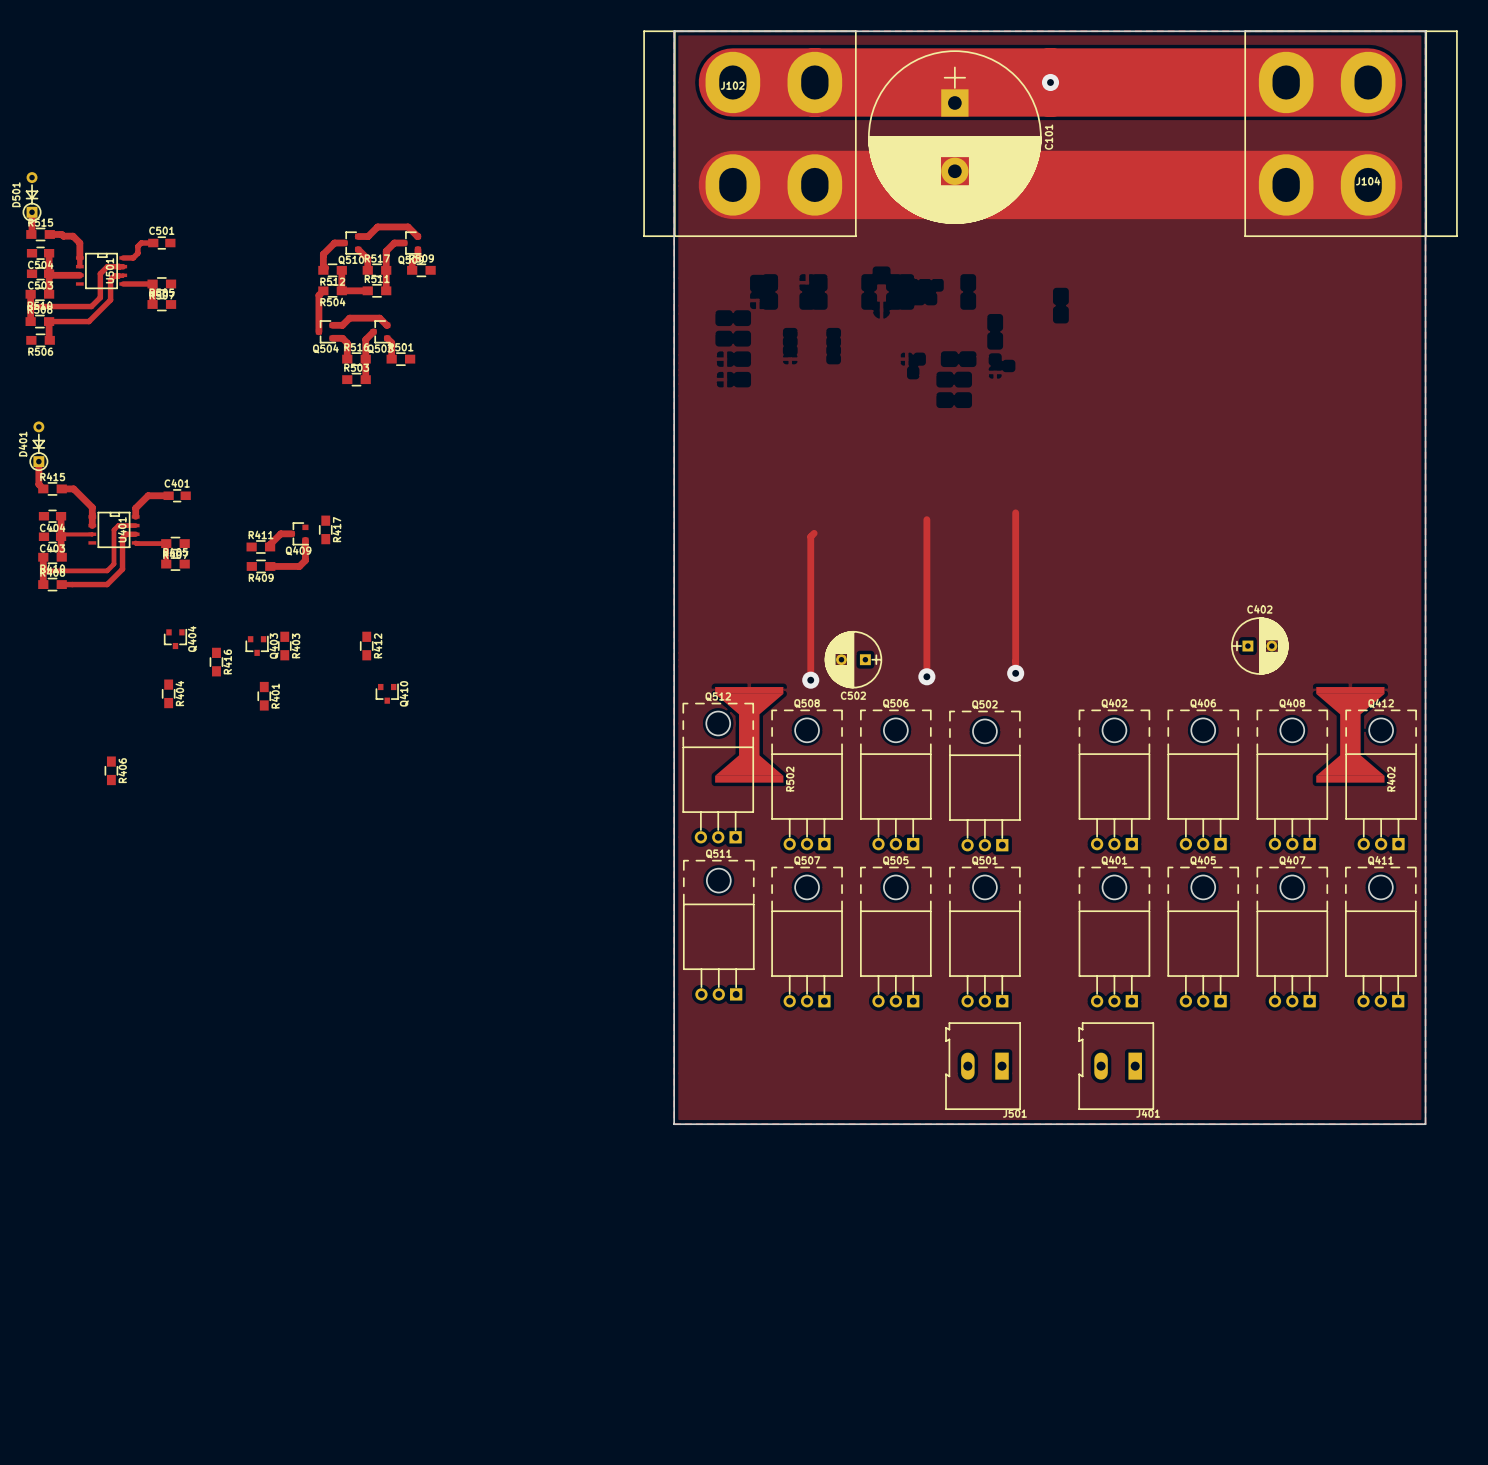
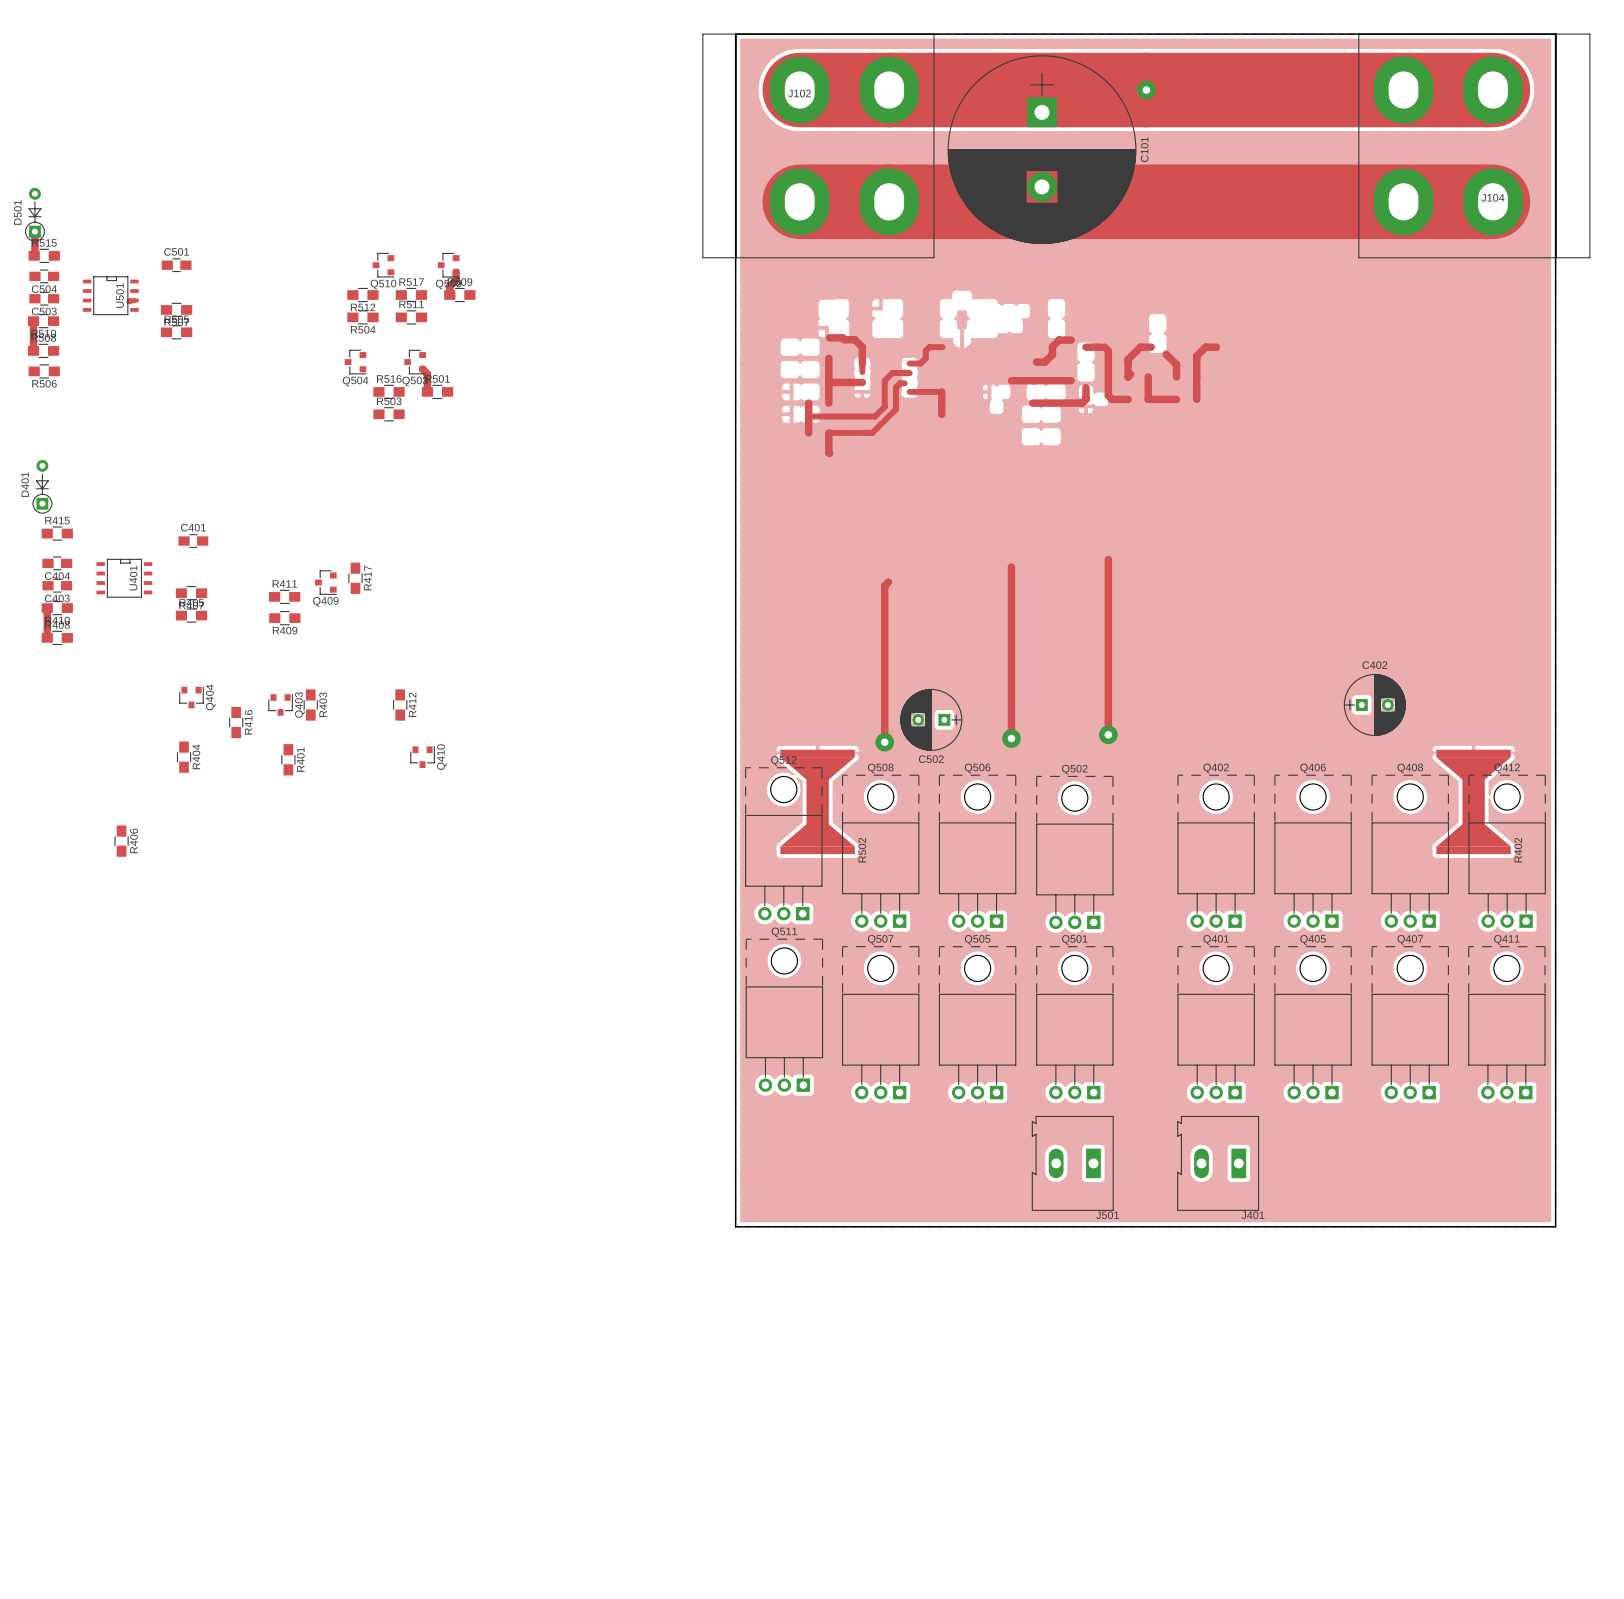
track: (49, 234) (73, 236) (79, 243) (79, 265) -> none
track: (358, 236) (368, 236) (377, 226) (408, 226) (417, 236) -> none
track: (153, 243) (141, 243) (137, 246) (137, 253) (133, 257) (123, 257) -> none
track: (344, 243) (334, 243) (323, 254) (323, 270) (325, 267) -> none
track: (404, 243) (394, 243) (386, 251) (386, 290) -> none
track: (358, 249) (367, 259) (367, 270) -> none
track: (49, 253) (49, 294) -> none
track: (123, 266) (107, 266) (100, 273) (100, 297) (91, 306) (30, 306) -> none
track: (341, 270) (341, 290) (367, 290) -> none
track: (49, 273) (79, 275) -> none
track: (118, 276) (114, 276) (110, 279) (110, 299) (88, 321) (49, 321) (49, 340) -> none
track: (123, 284) (152, 284) (152, 304) -> none
track: (323, 290) (318, 295) (318, 331) -> none
track: none -> (829, 337) (854, 339) (862, 347) (862, 372)
track: none -> (1071, 340) (1059, 340) (1052, 346) (1052, 354) (1045, 362) (1036, 362)
track: none -> (942, 347) (929, 347) (925, 350) (925, 358) (920, 363) (909, 363)
track: none -> (1085, 347) (1100, 347)
track: none -> (1104, 347) (1108, 350) (1108, 395) (1112, 399) (1128, 399)
track: none -> (1151, 347) (1140, 347) (1128, 359) (1128, 377) (1130, 374)
track: none -> (1216, 347) (1205, 347) (1196, 356) (1196, 399)
track: none -> (1166, 354) (1176, 364) (1176, 377)
track: (332, 325) (342, 325) (349, 318) (379, 318) (387, 325) -> none
track: none -> (828, 358) (828, 403)
track: (373, 331) (365, 339) (365, 379) -> none
track: (332, 338) (342, 338) (347, 343) (347, 359) -> none
track: none -> (909, 373) (892, 372) (884, 380) (884, 406) (875, 416) (808, 416)
track: none -> (1148, 377) (1148, 399) (1176, 399)
track: none -> (828, 380) (830, 382) (862, 382)
track: none -> (1011, 380) (1071, 380)
track: none -> (904, 383) (900, 383) (895, 387) (895, 409) (872, 432) (828, 432) (829, 453)
track: none -> (1085, 387) (1085, 399) (1082, 403) (1032, 403)
track: none -> (909, 391) (941, 391) (941, 414)
track: none -> (808, 403) (808, 432)
track: (38, 461) (38, 484) (43, 488) -> none
track: (61, 488) (73, 488) (92, 507) (92, 525) -> none
track: (168, 495) (148, 495) (135, 508) (135, 516) -> none
track: (61, 516) (61, 557) -> none
track: (135, 525) (118, 525) (114, 529) (114, 564) (107, 570) (45, 570) (43, 566) -> none
track: (291, 533) (280, 533) (270, 544) (270, 546) -> none
track: (92, 534) (63, 534) (61, 536) -> none
track: (135, 534) (126, 534) (122, 538) (122, 569) (107, 584) (61, 584) -> none
track: (305, 540) (305, 560) (299, 566) (270, 566) -> none
track: (135, 542) (166, 543) (166, 564) -> none

